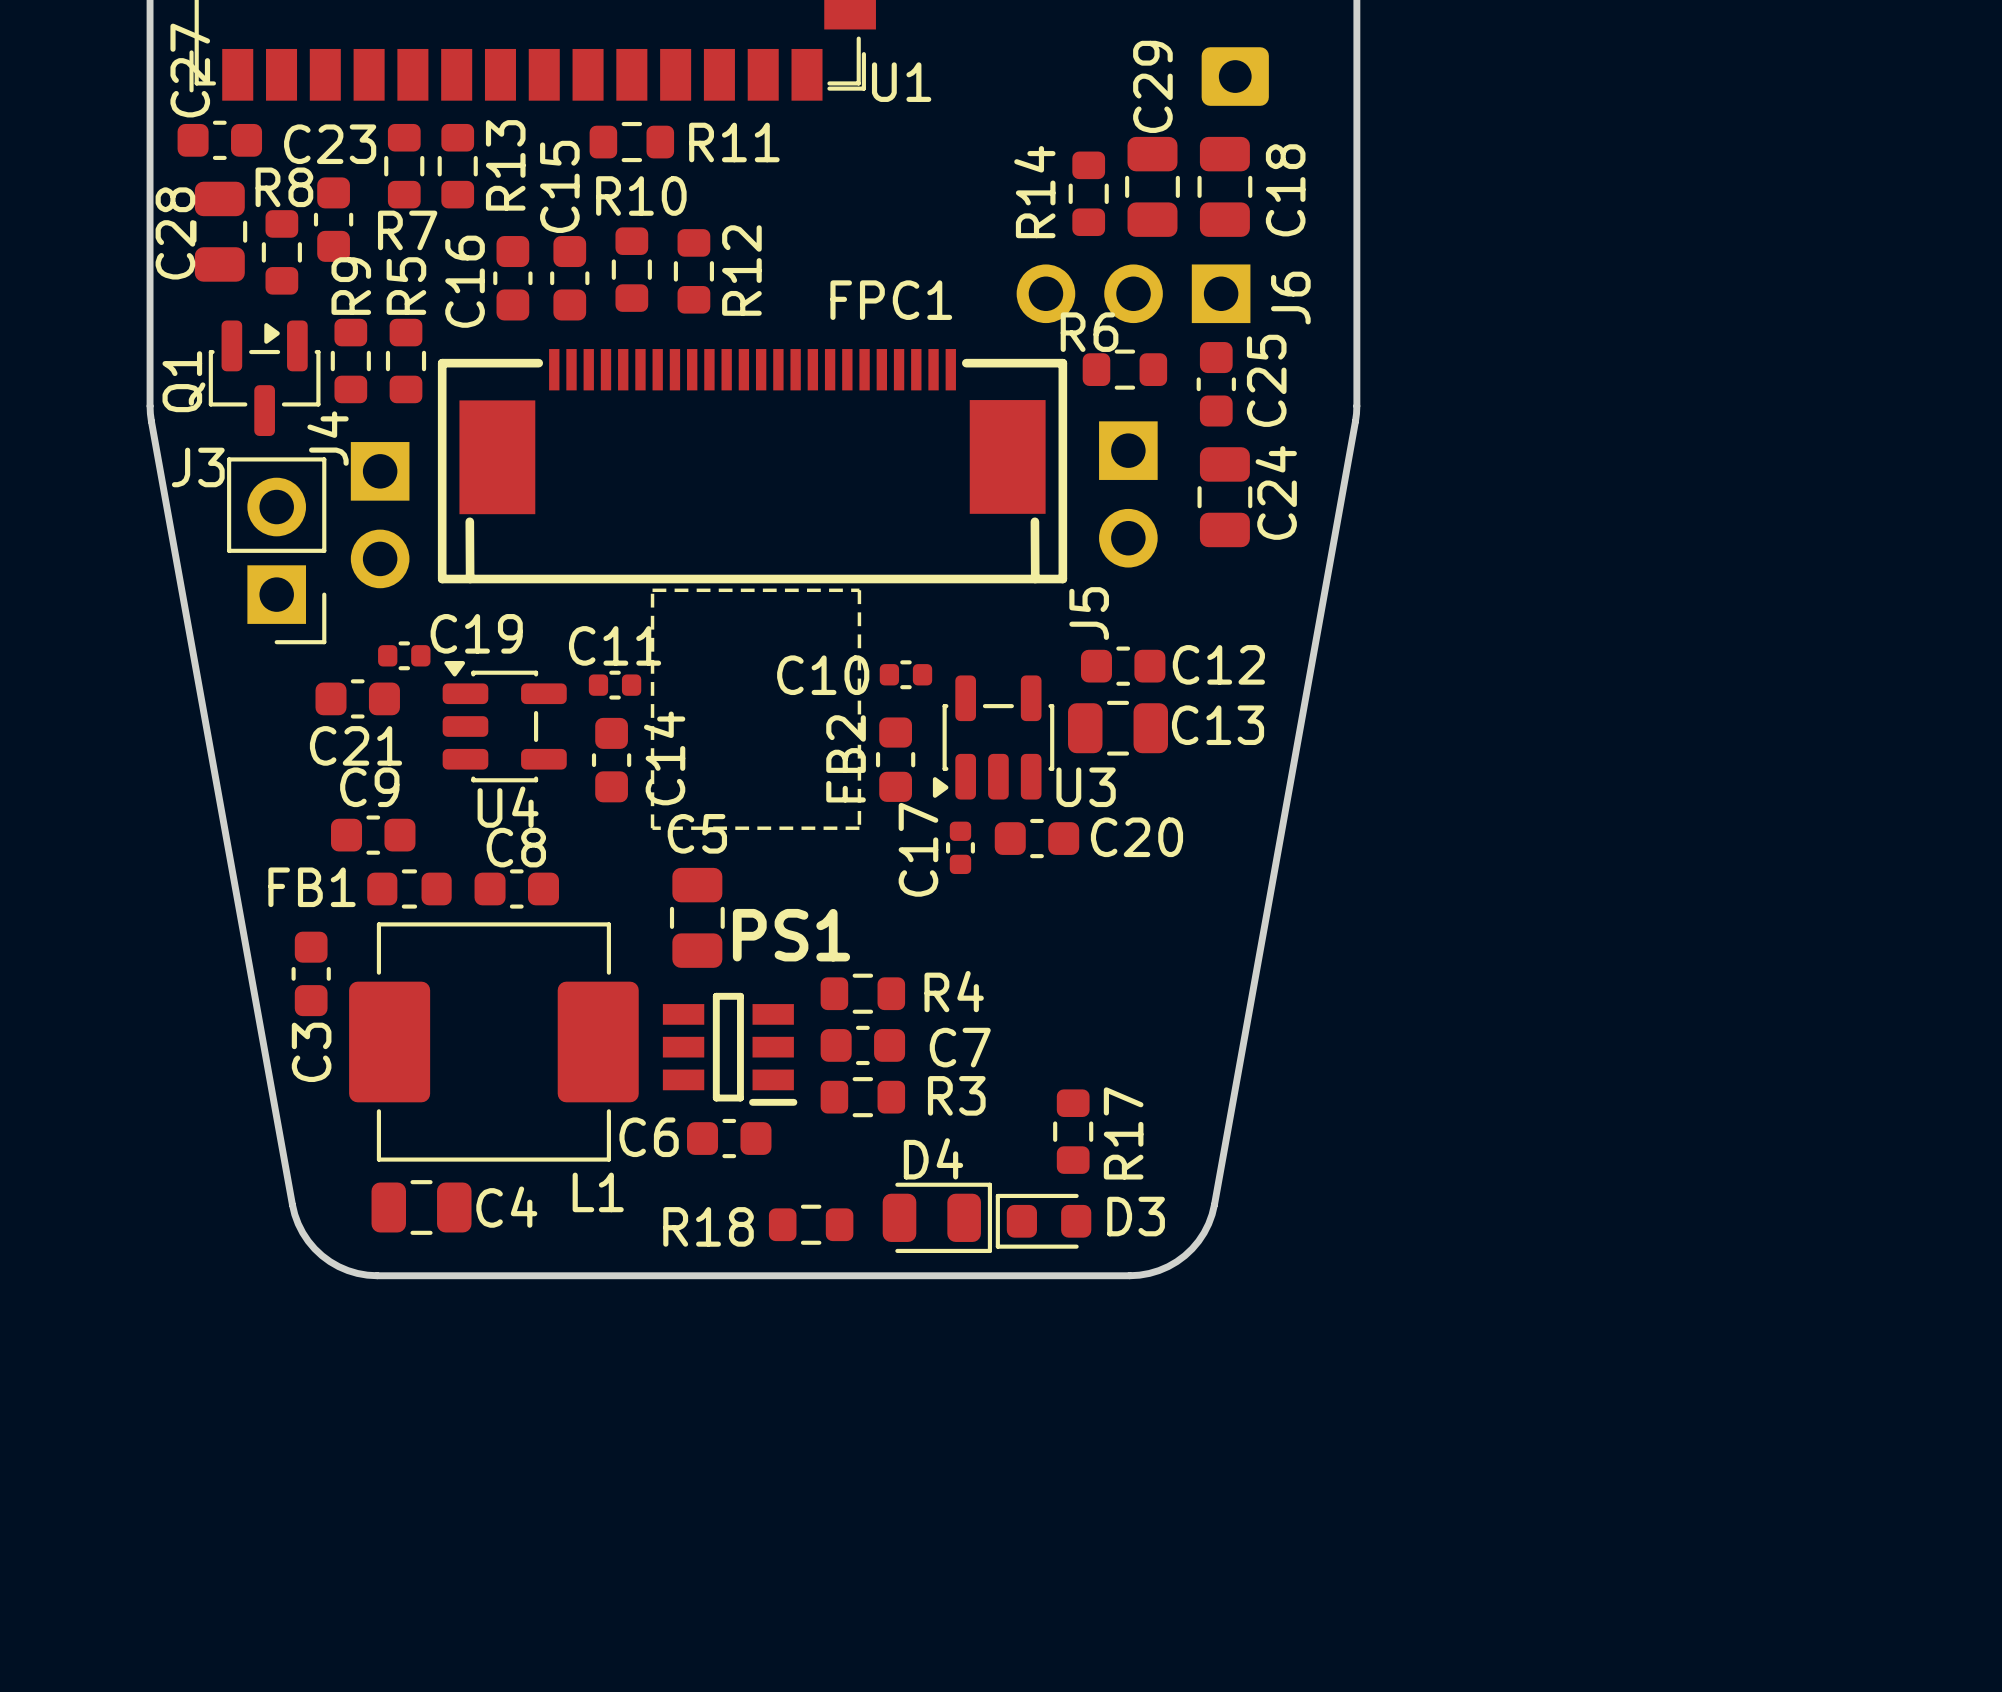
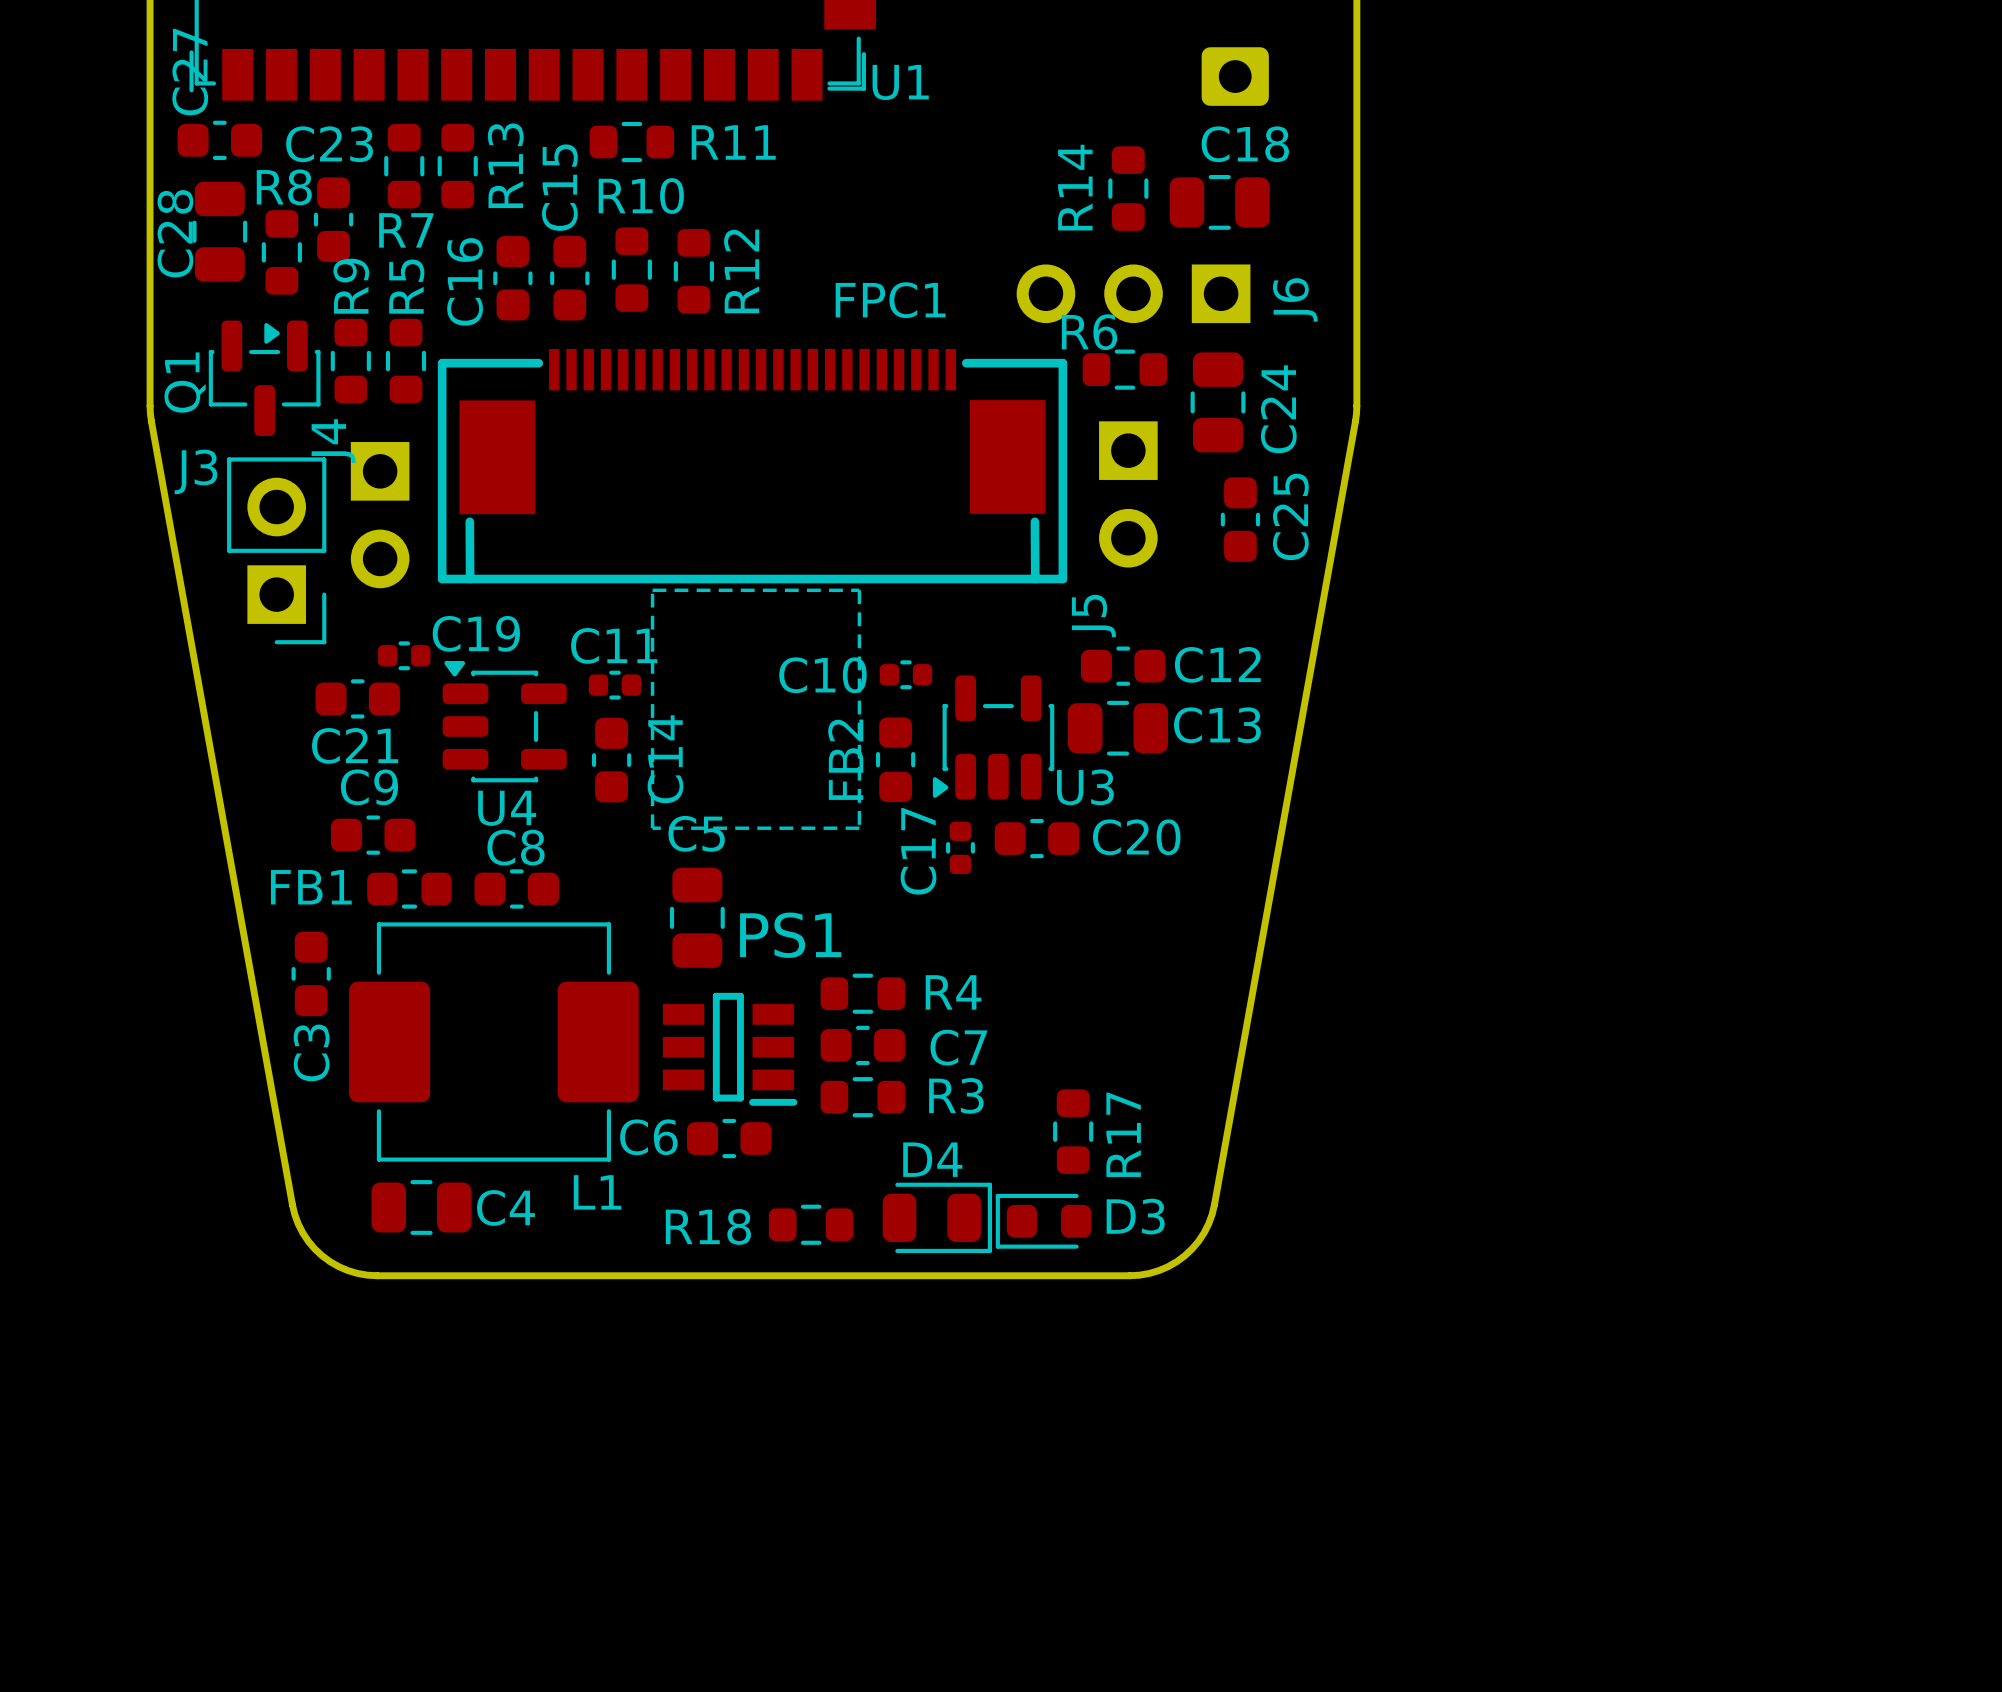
C29: (1152, 186) -> none
C18 rotation: 0° (1224, 186) -> 90° clockwise (1219, 202)
C18 name position: C18 (1285, 190) -> C18 (1245, 144)
R14 position: (1088, 193) -> (1128, 188)
C25 position: (1216, 384) -> (1240, 519)
C24 name position: C24 (1276, 492) -> C24 (1278, 409)
C24 position: (1224, 497) -> (1218, 402)

